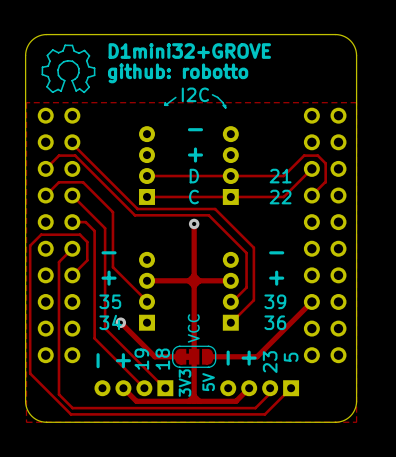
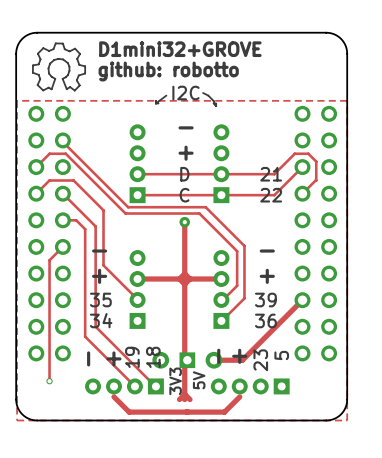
track: (72, 275) (87, 260) (87, 242) (79, 234) (41, 234) (30, 245) (30, 373) (71, 414) (264, 414) (291, 388) -> none
track: (120, 322) (154, 356) (180, 356) -> none
via: (120, 322) -> none
VCC: (194, 356) -> none
track: (207, 356) (257, 356) -> (213, 360) (242, 360) (247, 354)
part: none -> (187, 360)
track: (58, 382) (58, 394) (72, 408) (255, 408) (270, 393) (270, 388) -> none
via: none -> (49, 381)
track: (123, 388) (136, 401) (236, 401) (249, 388) -> none
track: none -> (114, 396) (129, 412) (224, 412) (239, 396)

